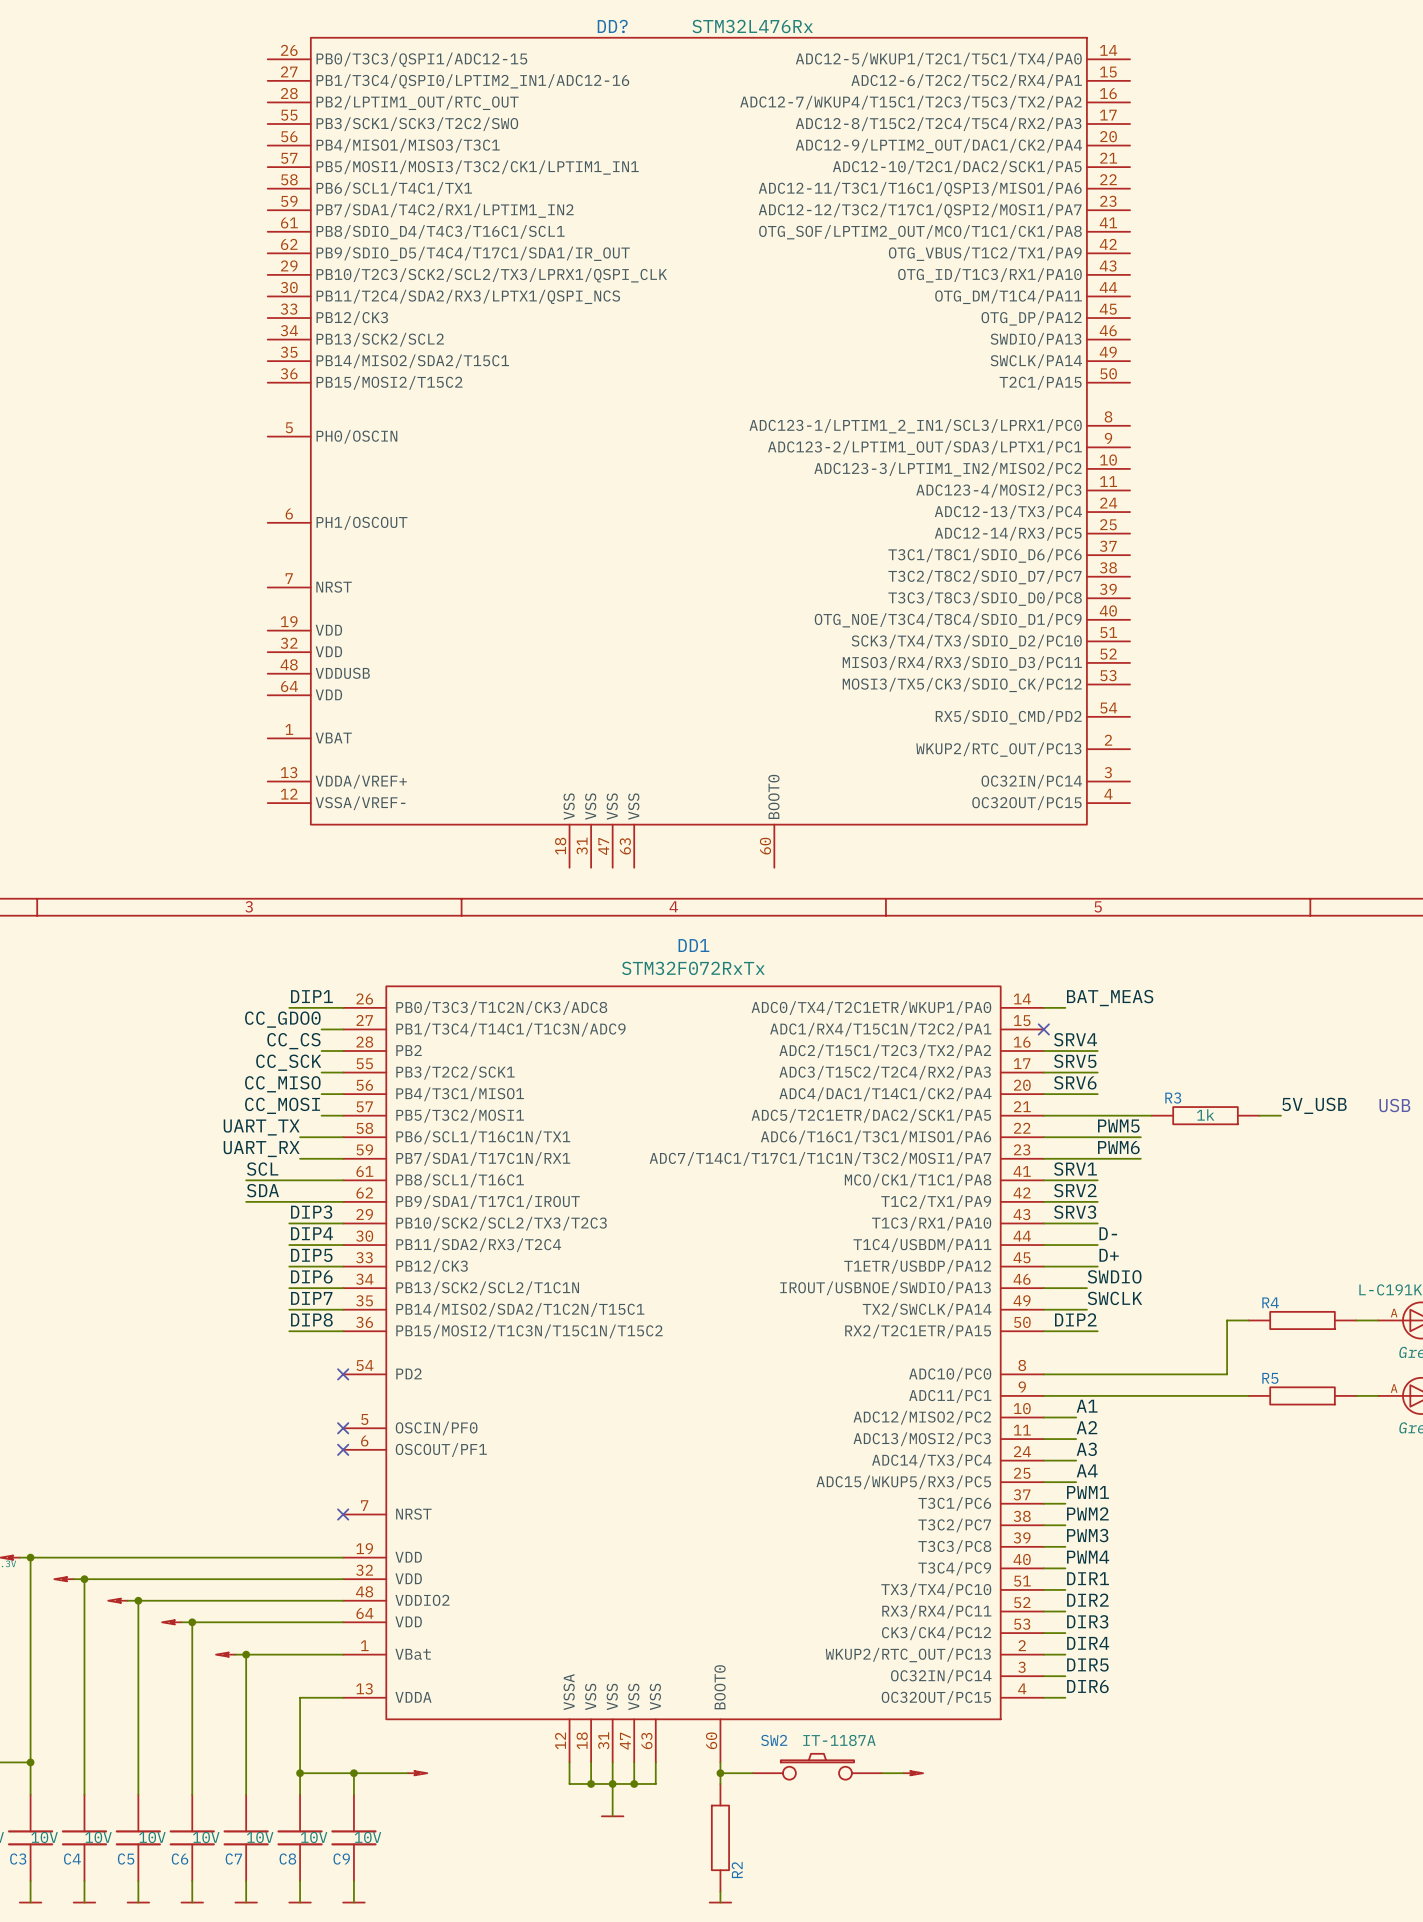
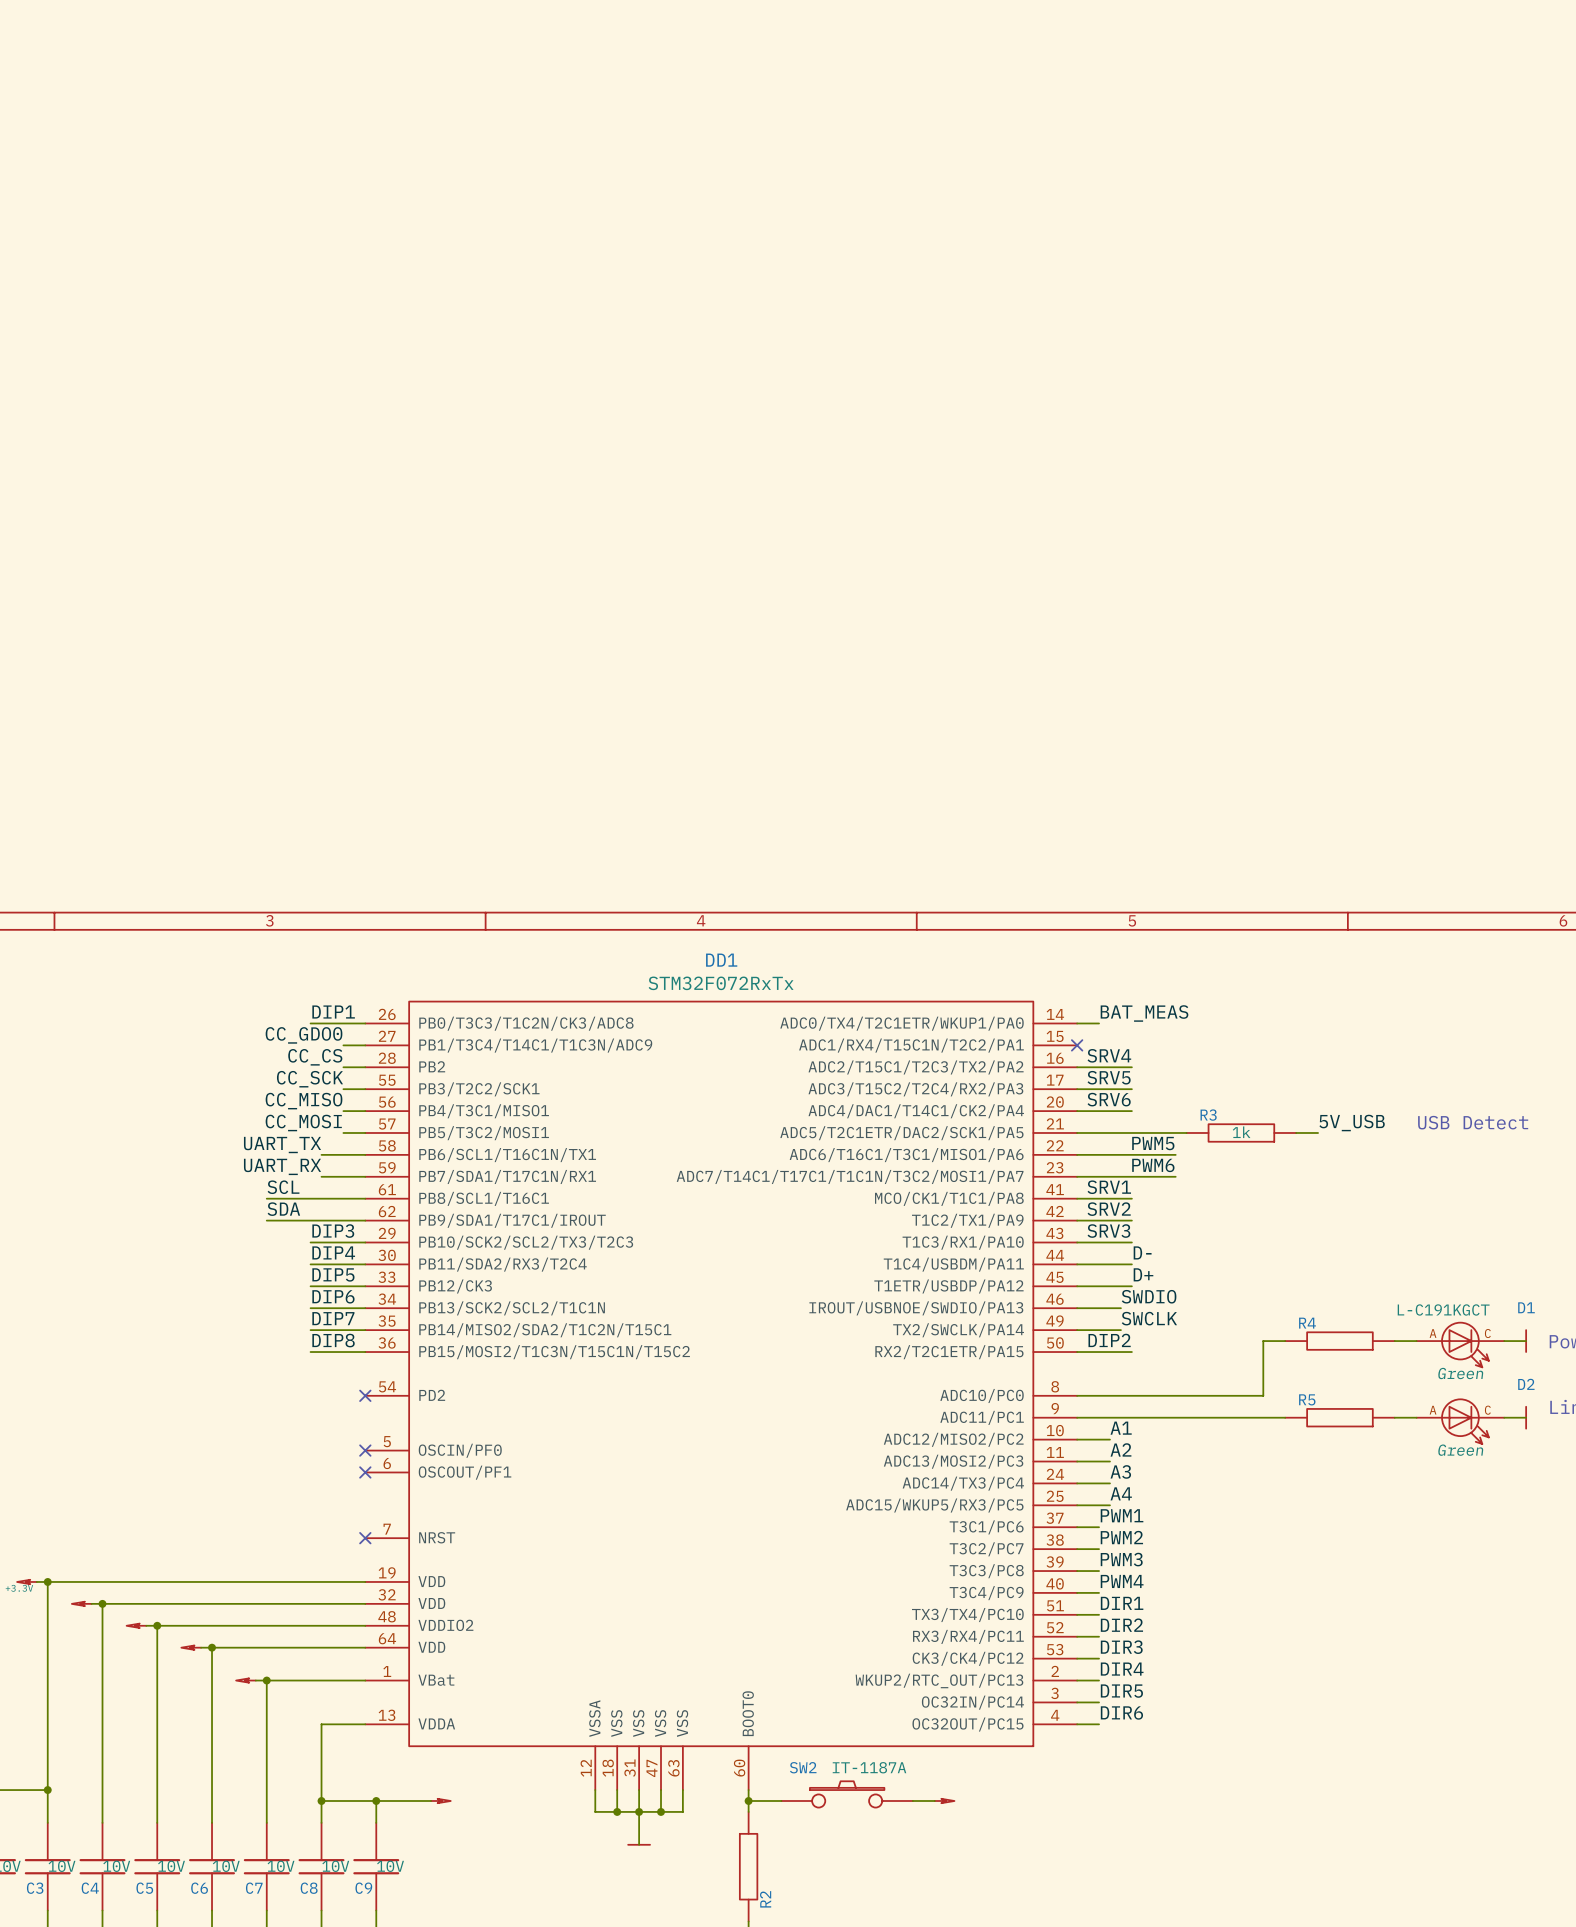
DD?: STM32L476Rx (698, 452) -> none

